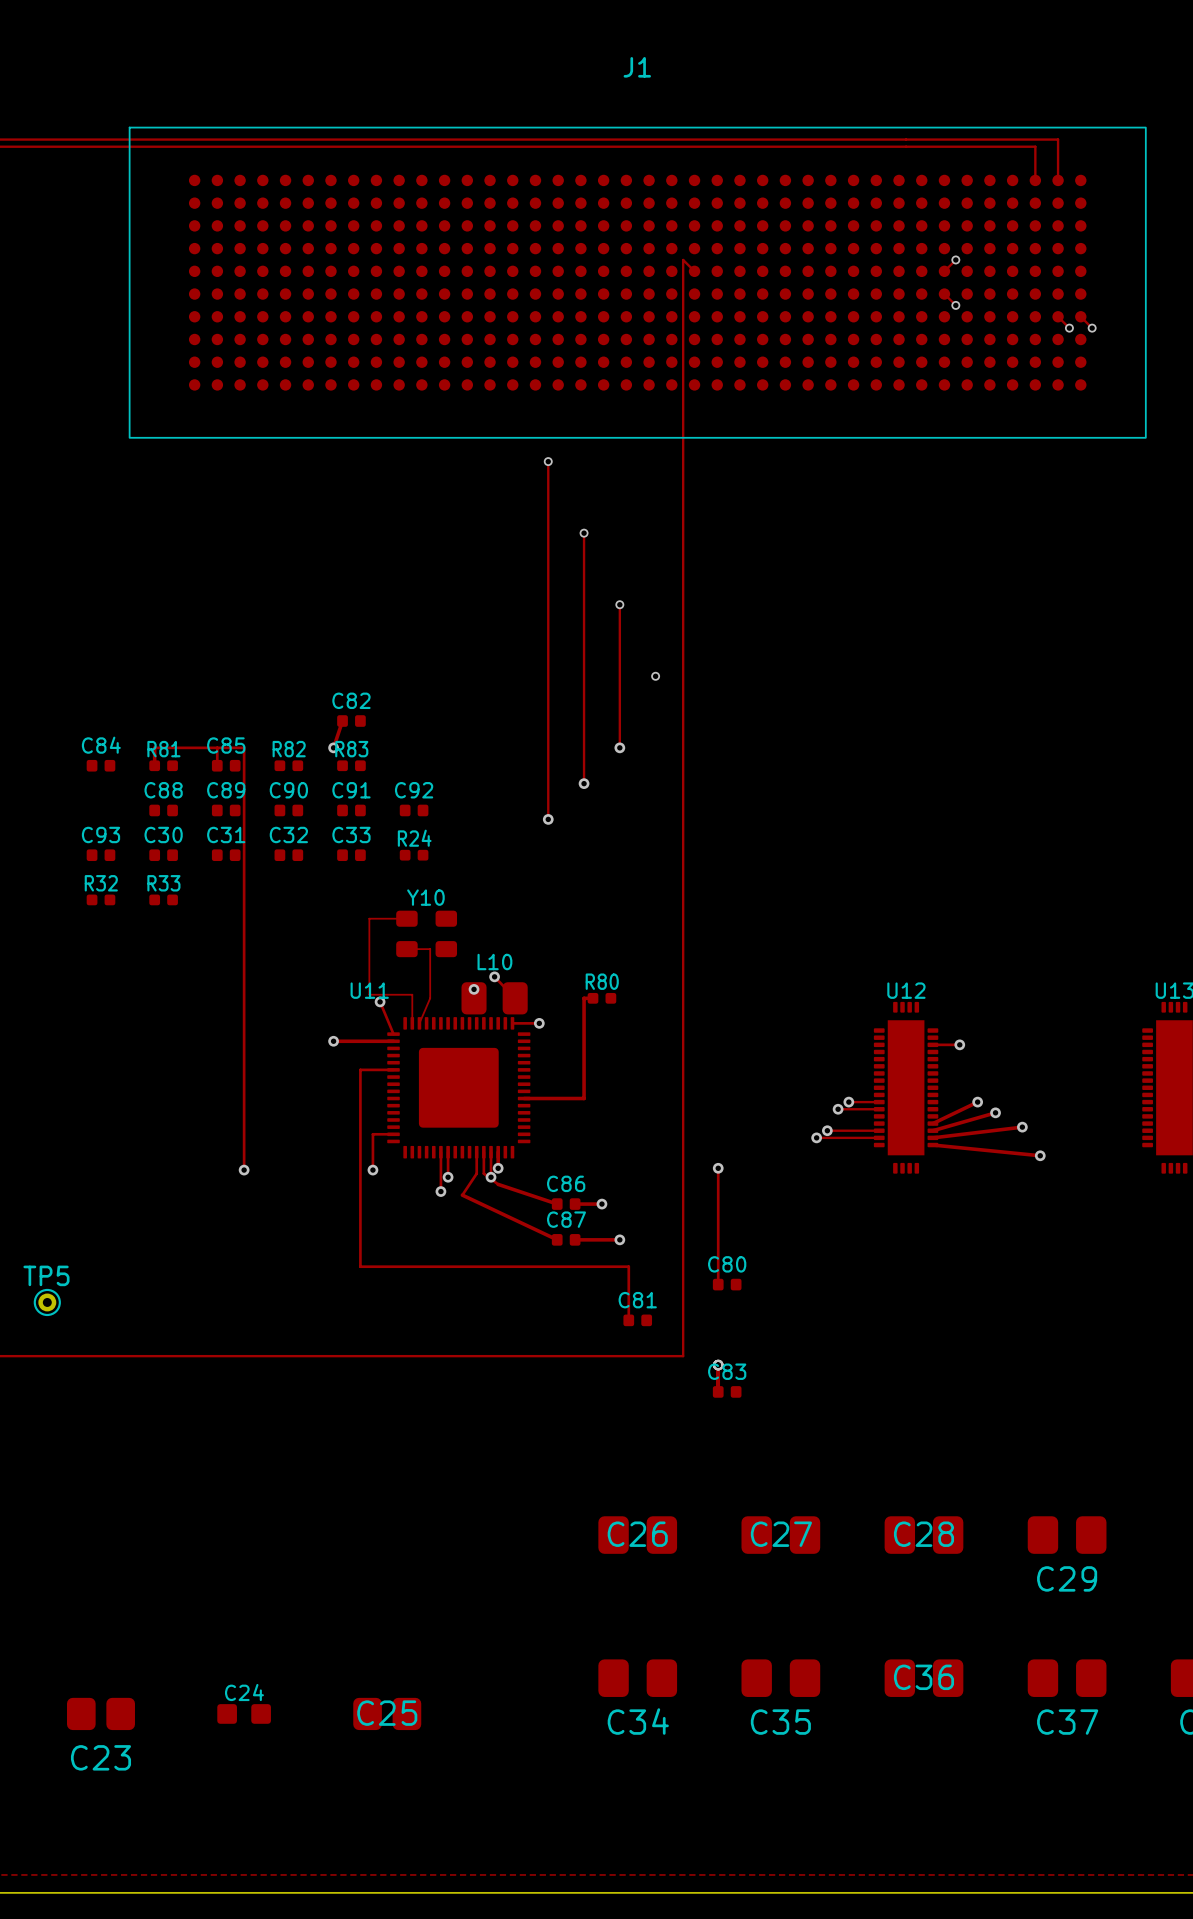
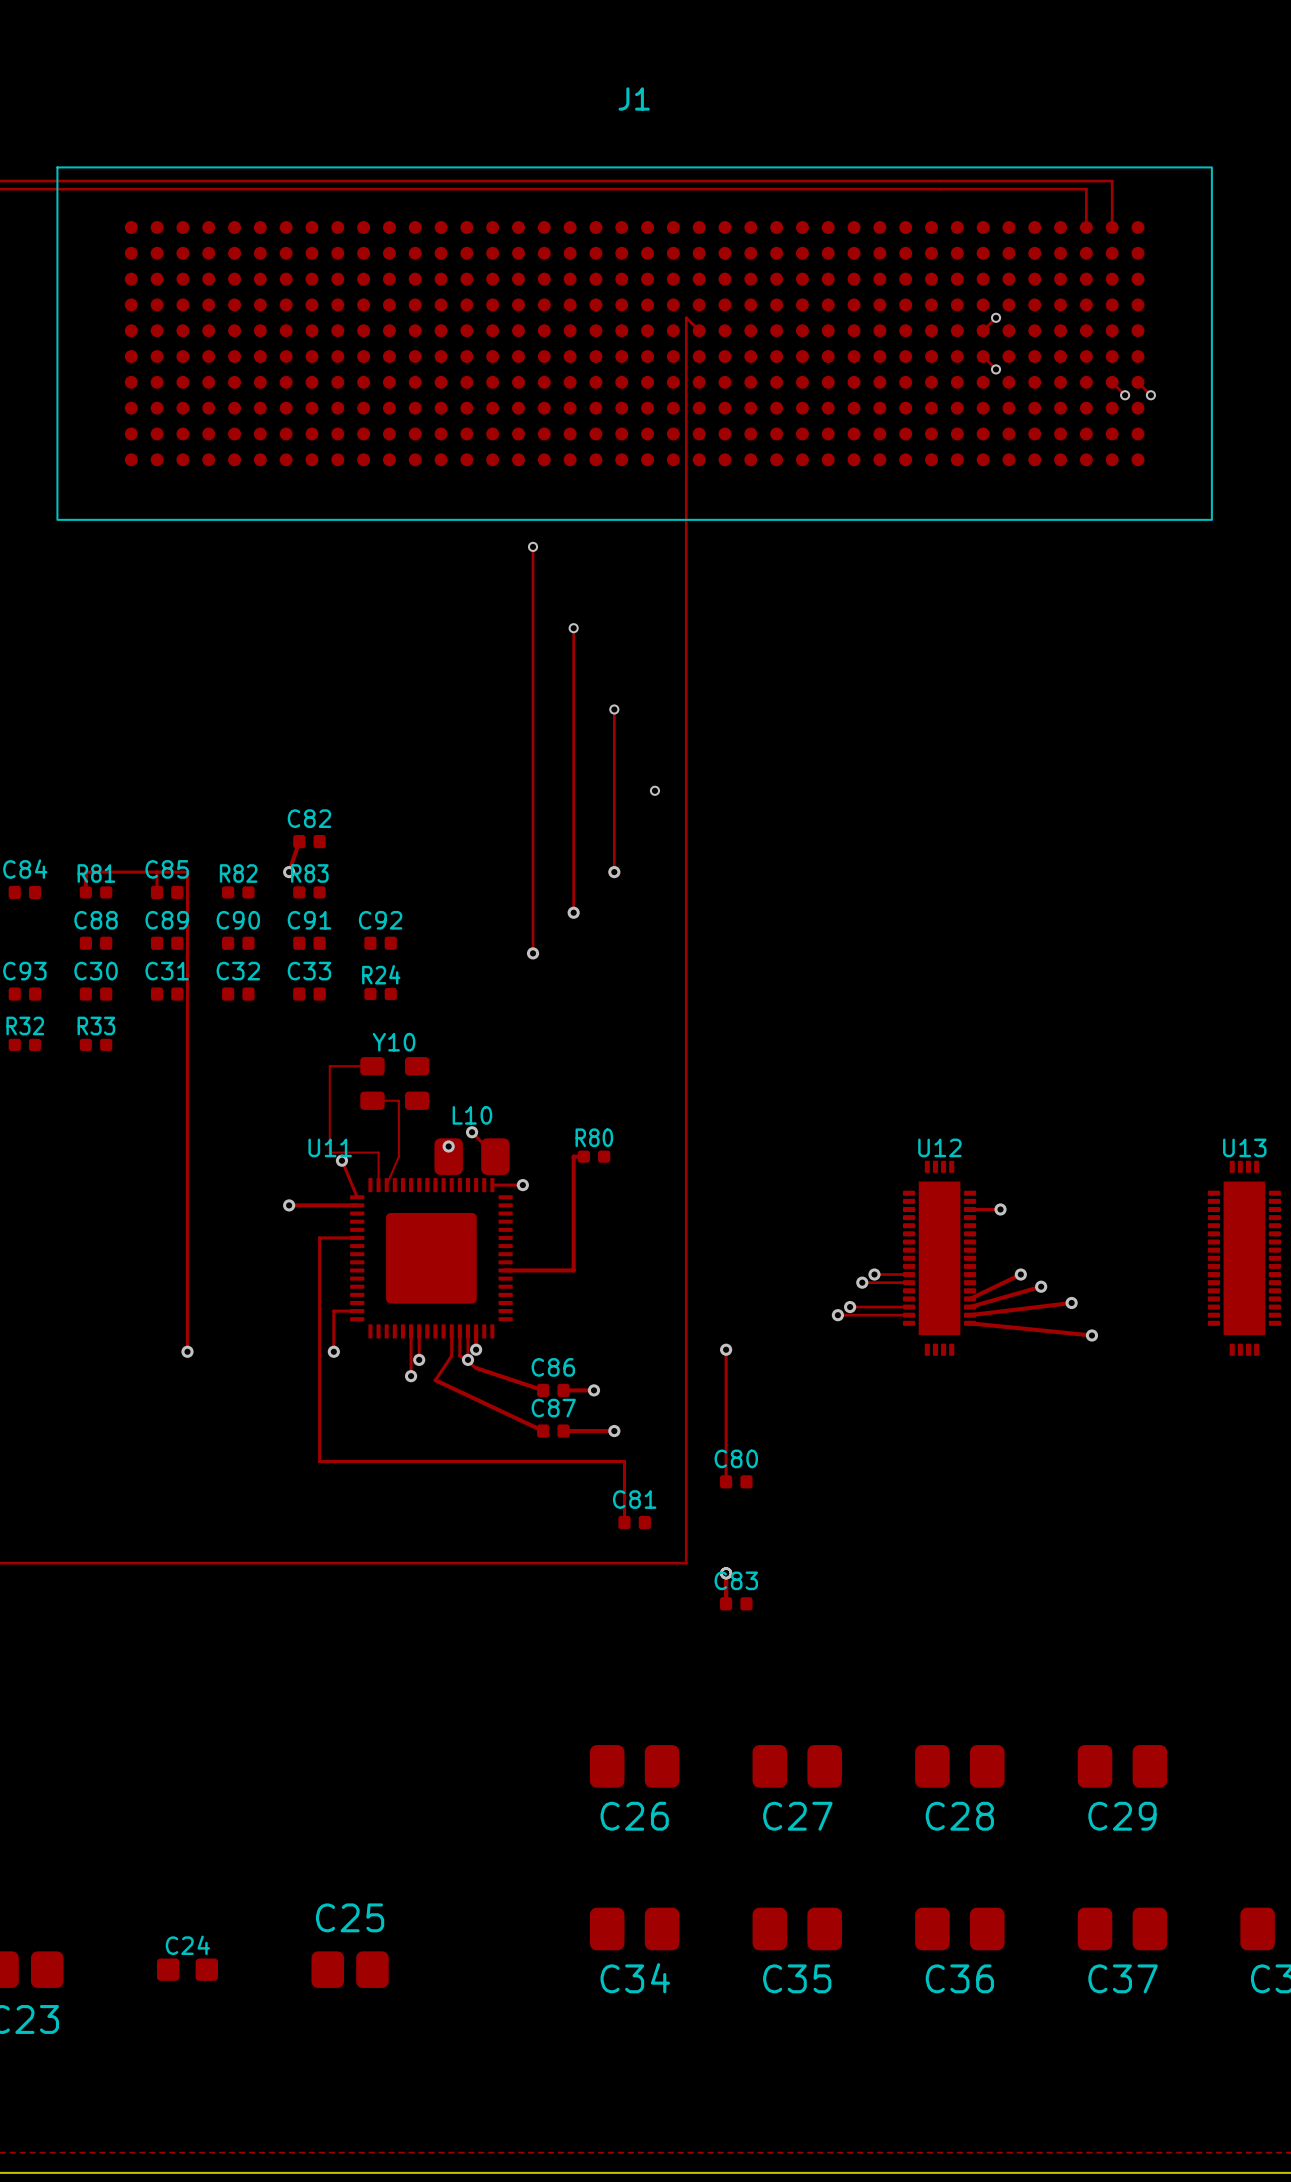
C26 name position: C26 (637, 1534) -> C26 (634, 1816)
C27 name position: C27 (781, 1534) -> C27 (797, 1816)
C28 name position: C28 (923, 1534) -> C28 (959, 1816)
C36 name position: C36 (923, 1677) -> C36 (959, 1978)
C25 name position: C25 (387, 1713) -> C25 (350, 1917)

